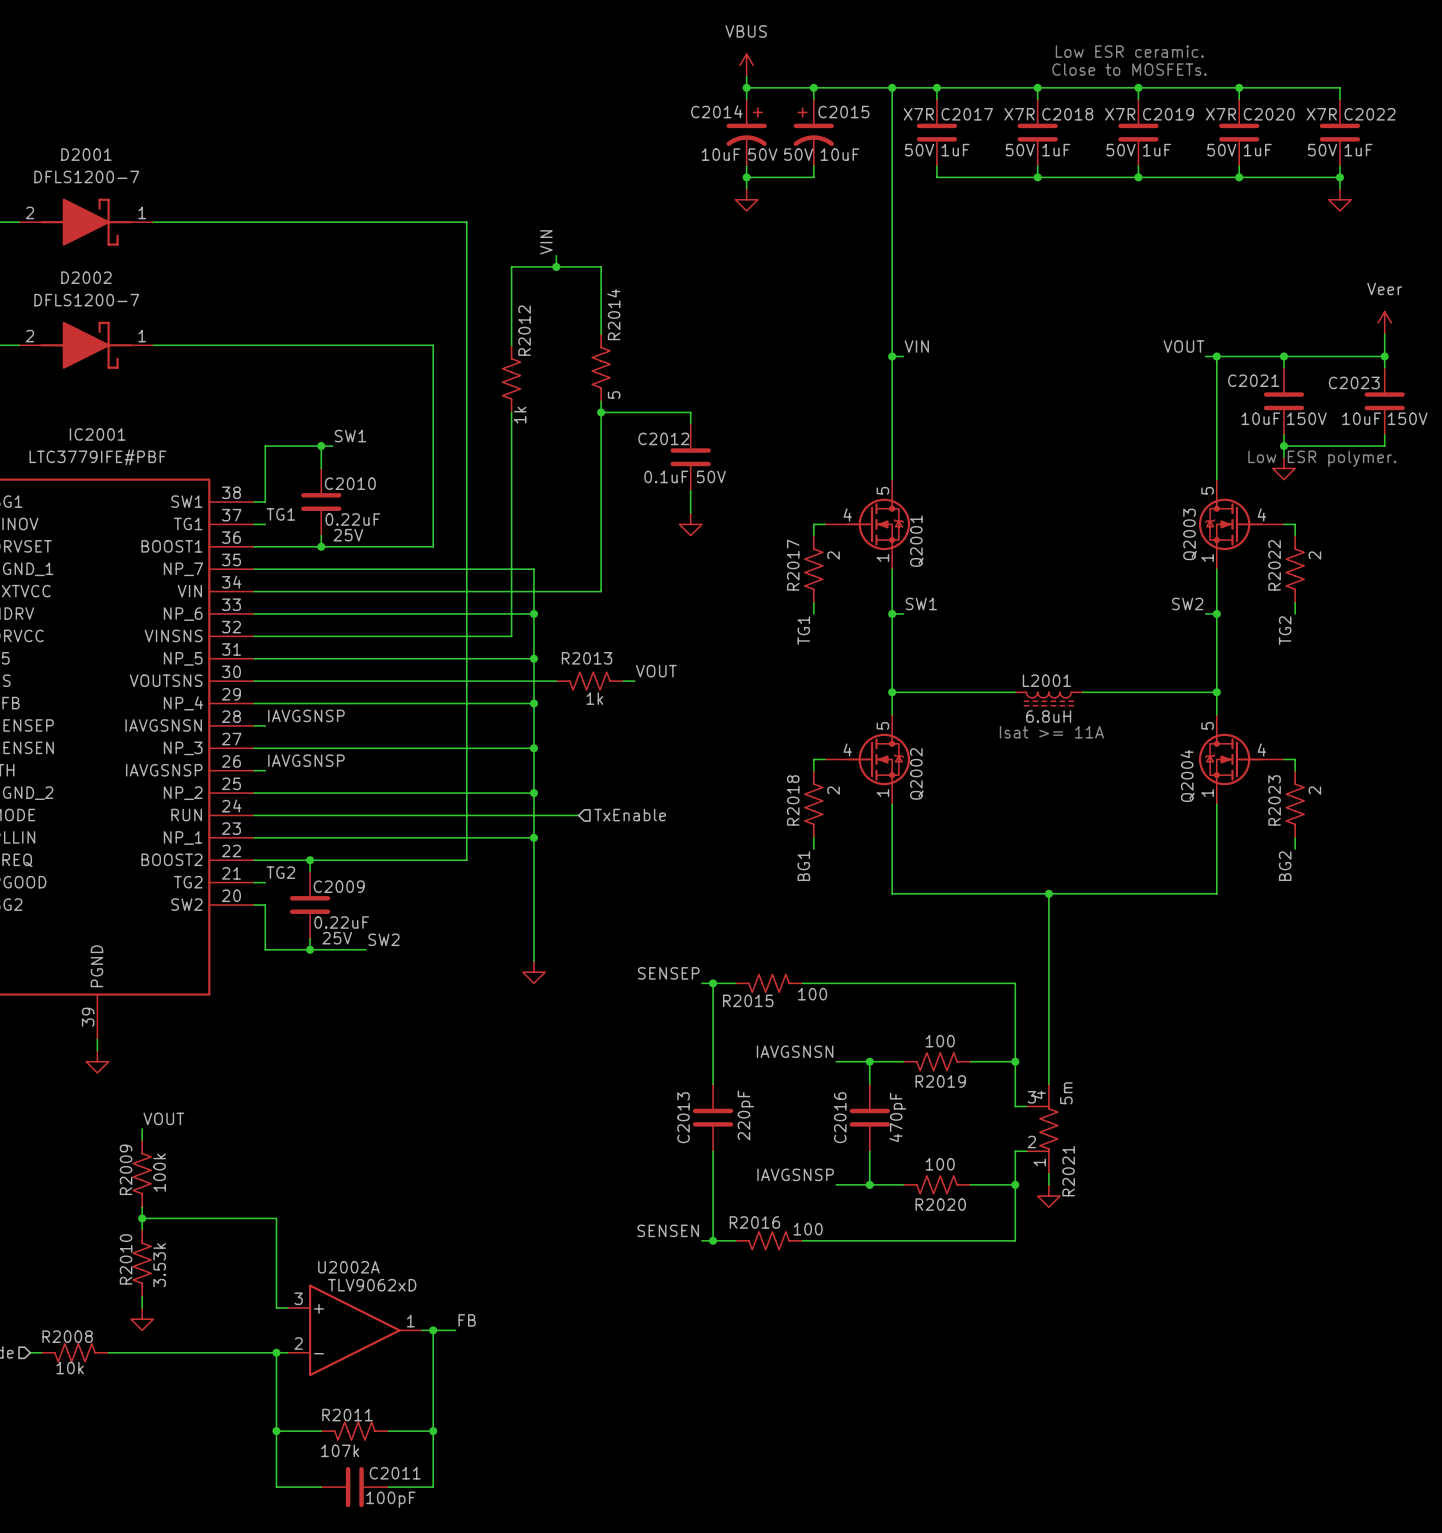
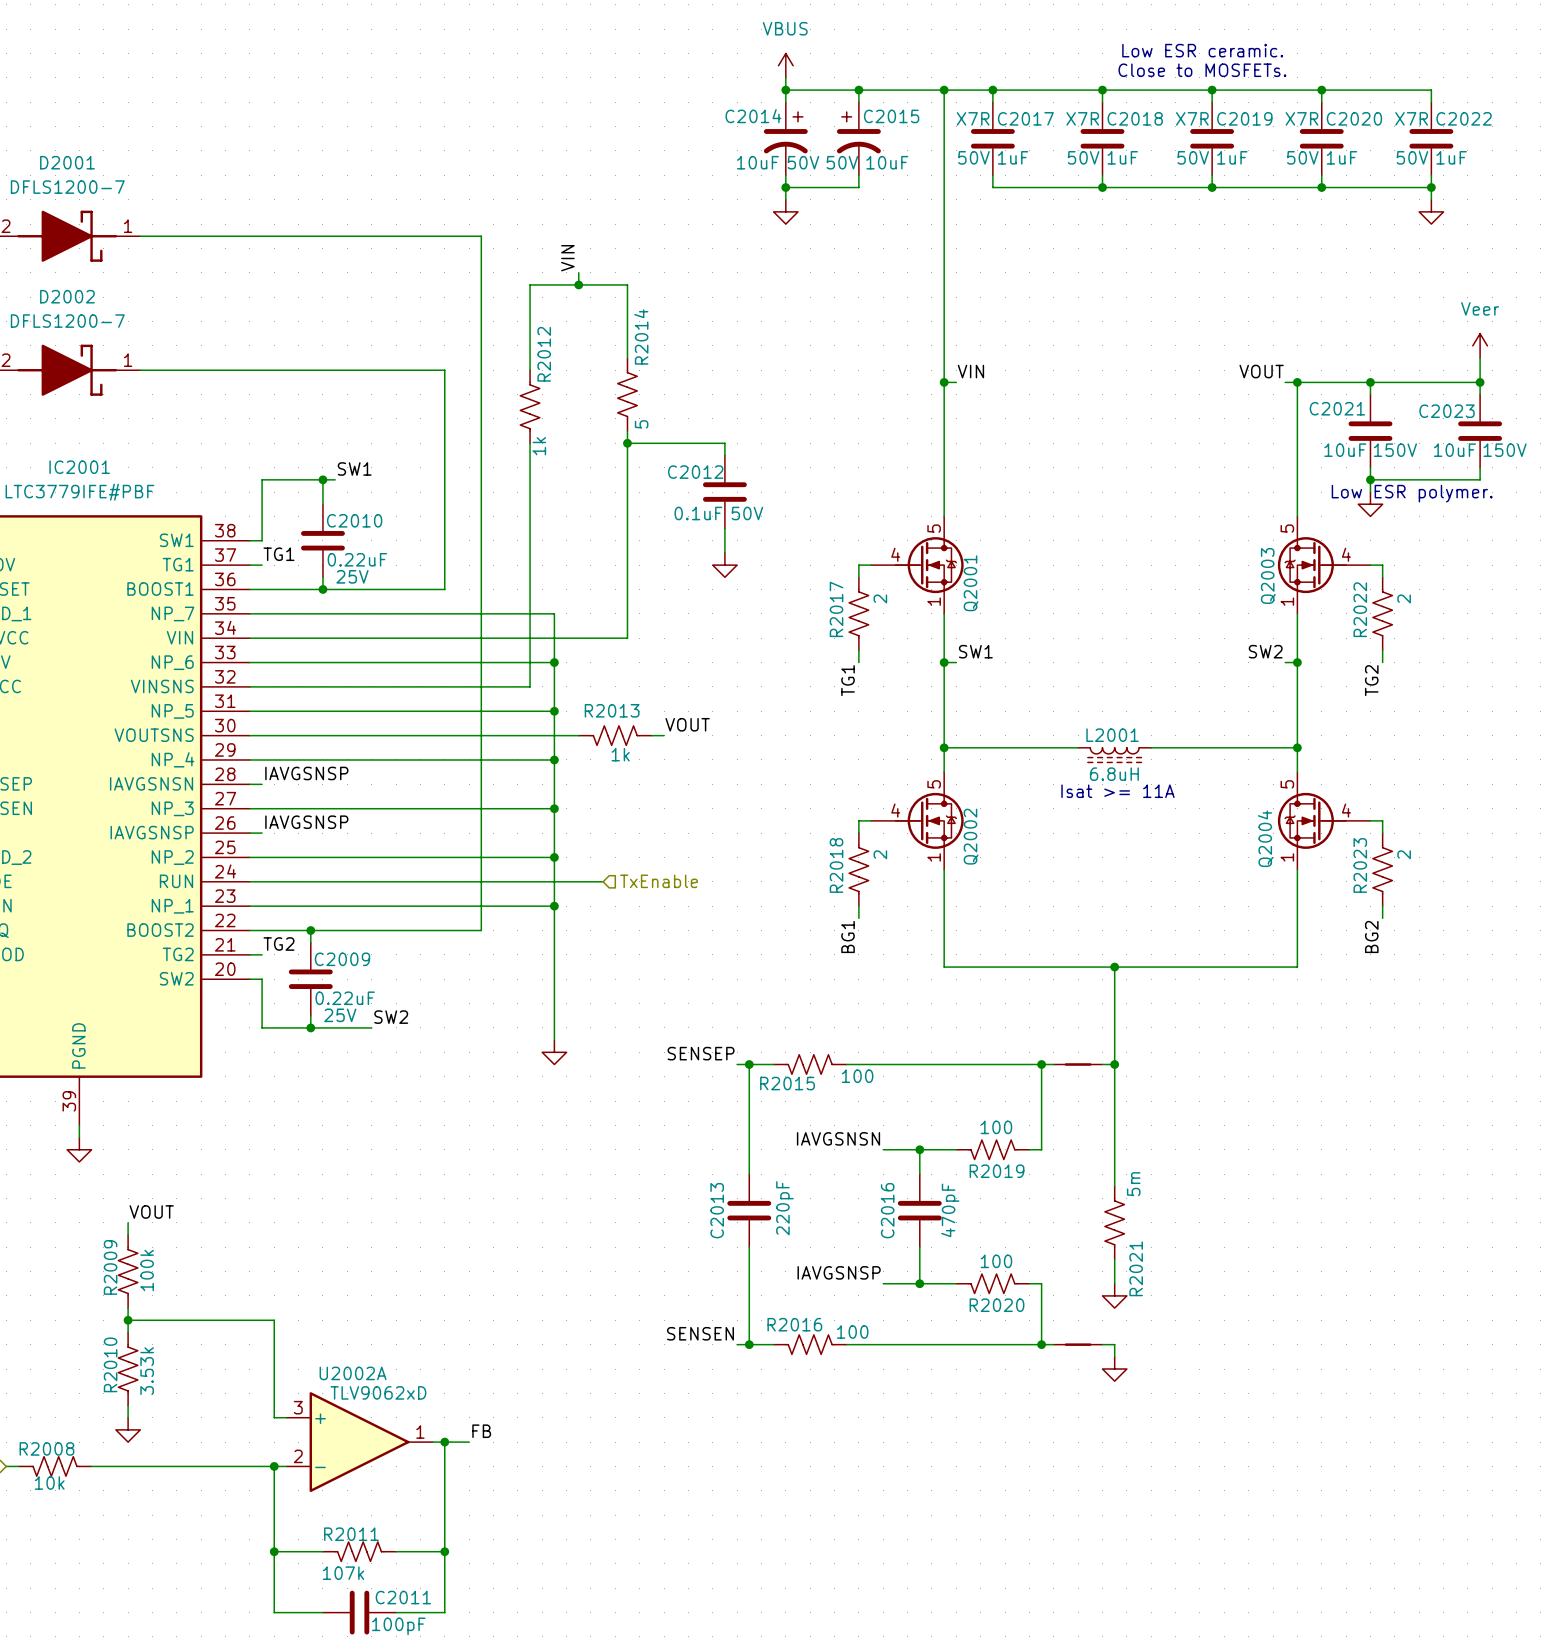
junction: none -> (1041, 1064)
wire: (992, 983) (1015, 983) (1015, 1106) (1026, 1106) -> none
part: none -> (1078, 1064)
wire: none -> (1102, 1064) (1114, 1064)
junction: none -> (1114, 1064)
wire: (981, 1061) (1015, 1061) -> (1041, 1149) (1041, 1064)
junction: (1015, 1061) -> none
R2021 symbol: [1026, 1084, 1058, 1174] -> [1104, 1186, 1125, 1260]
wire: (1026, 1151) (1015, 1151) (1015, 1240) (992, 1240) -> none
wire: (981, 1184) (1015, 1184) -> (1041, 1283) (1041, 1344)
junction: (1015, 1184) -> none
junction: none -> (1041, 1344)
part: none -> (1078, 1344)
wire: none -> (1102, 1344) (1114, 1344) (1114, 1356)
power symbol: none -> (1114, 1369)

